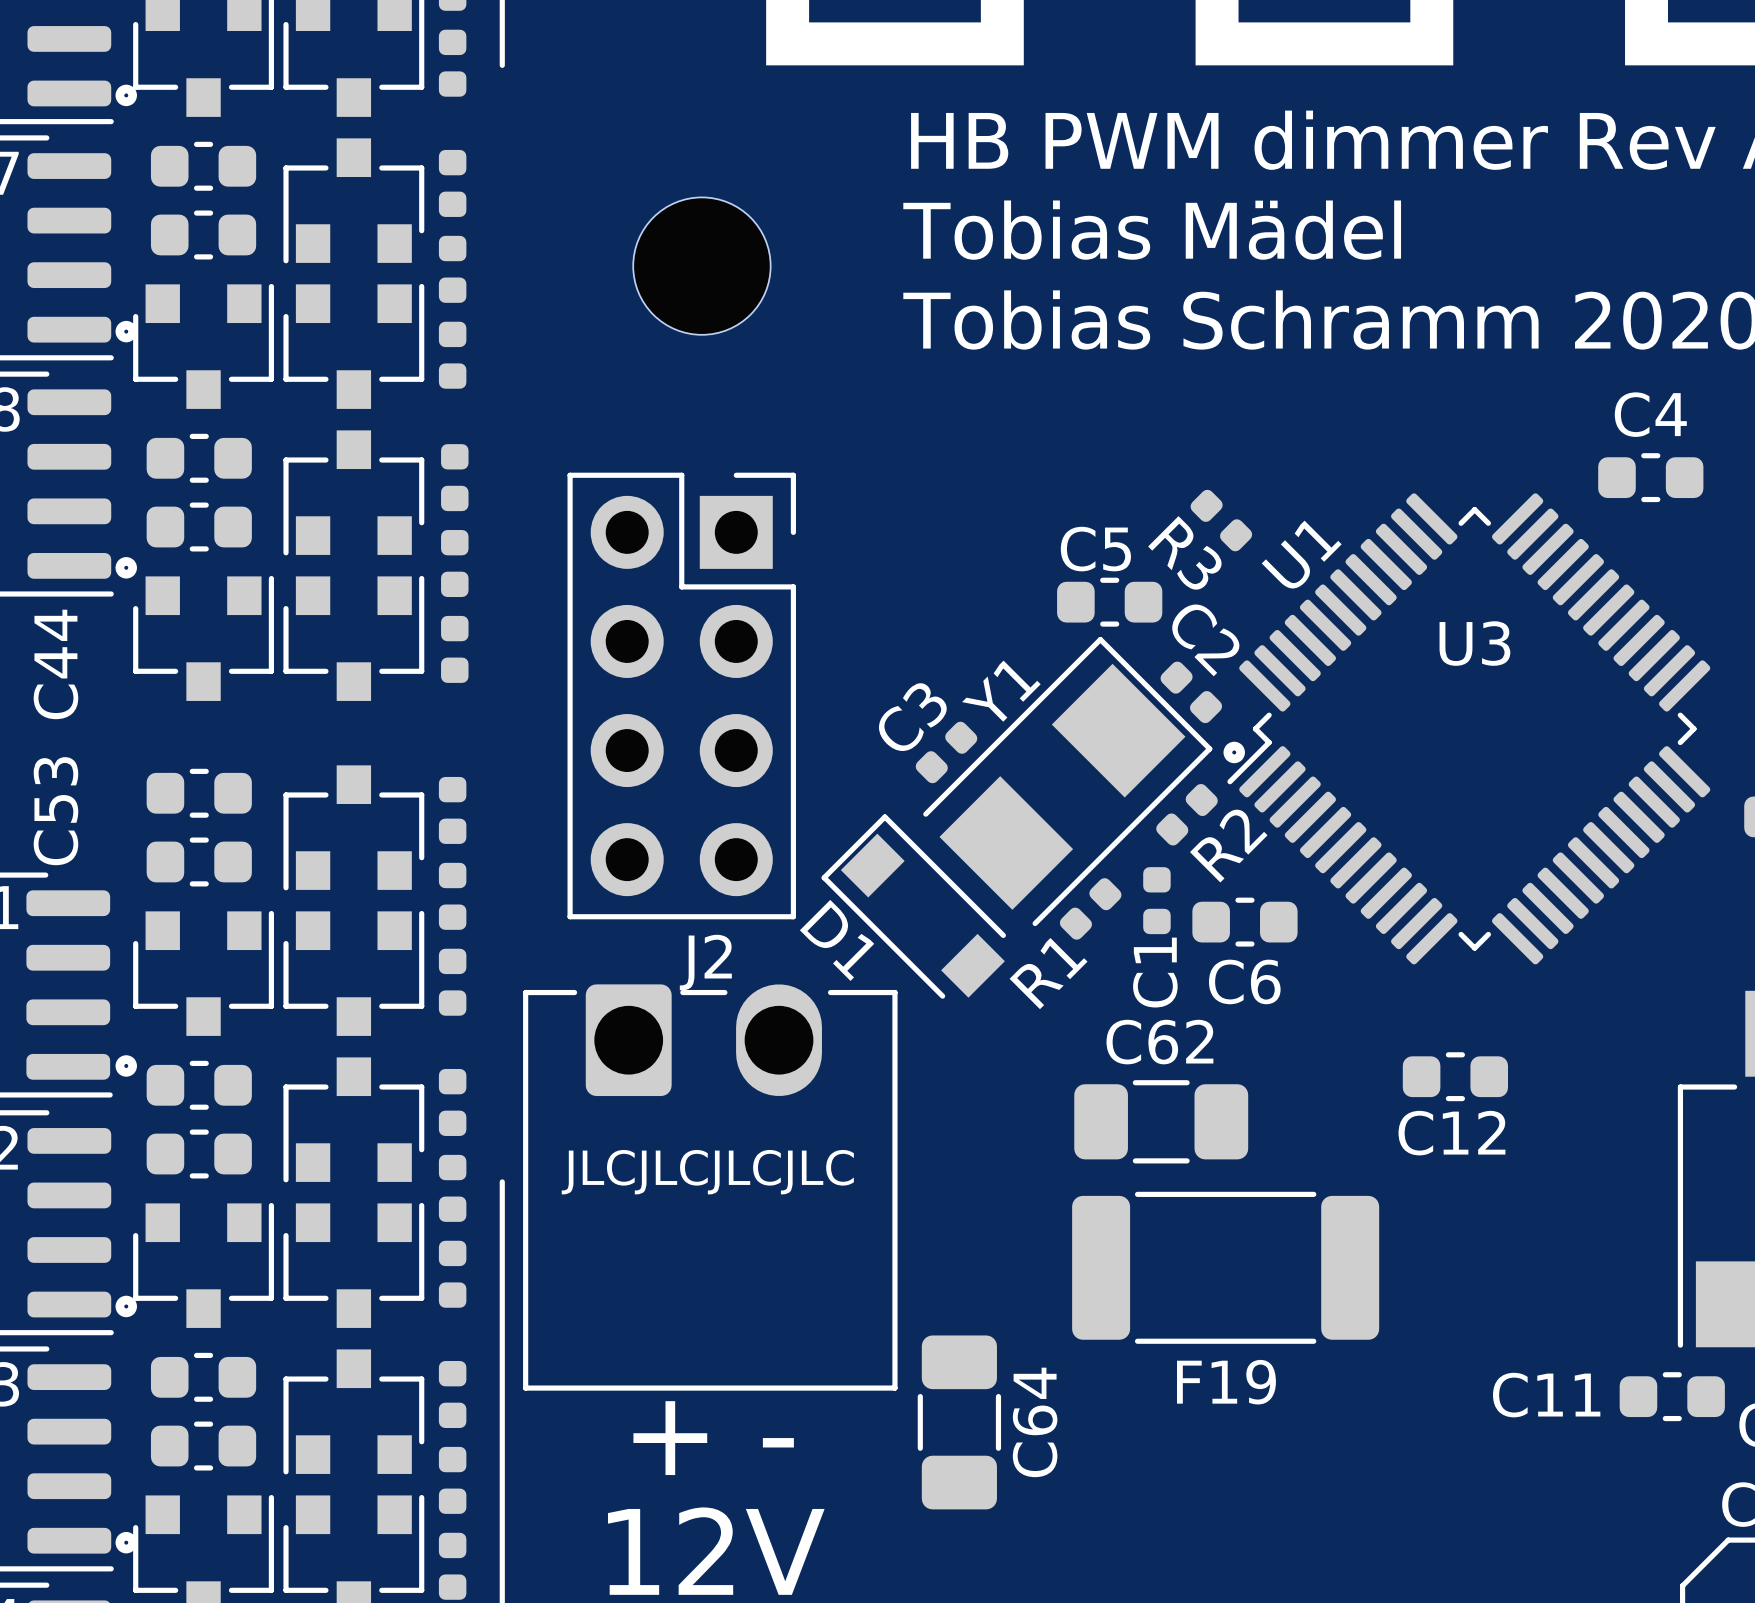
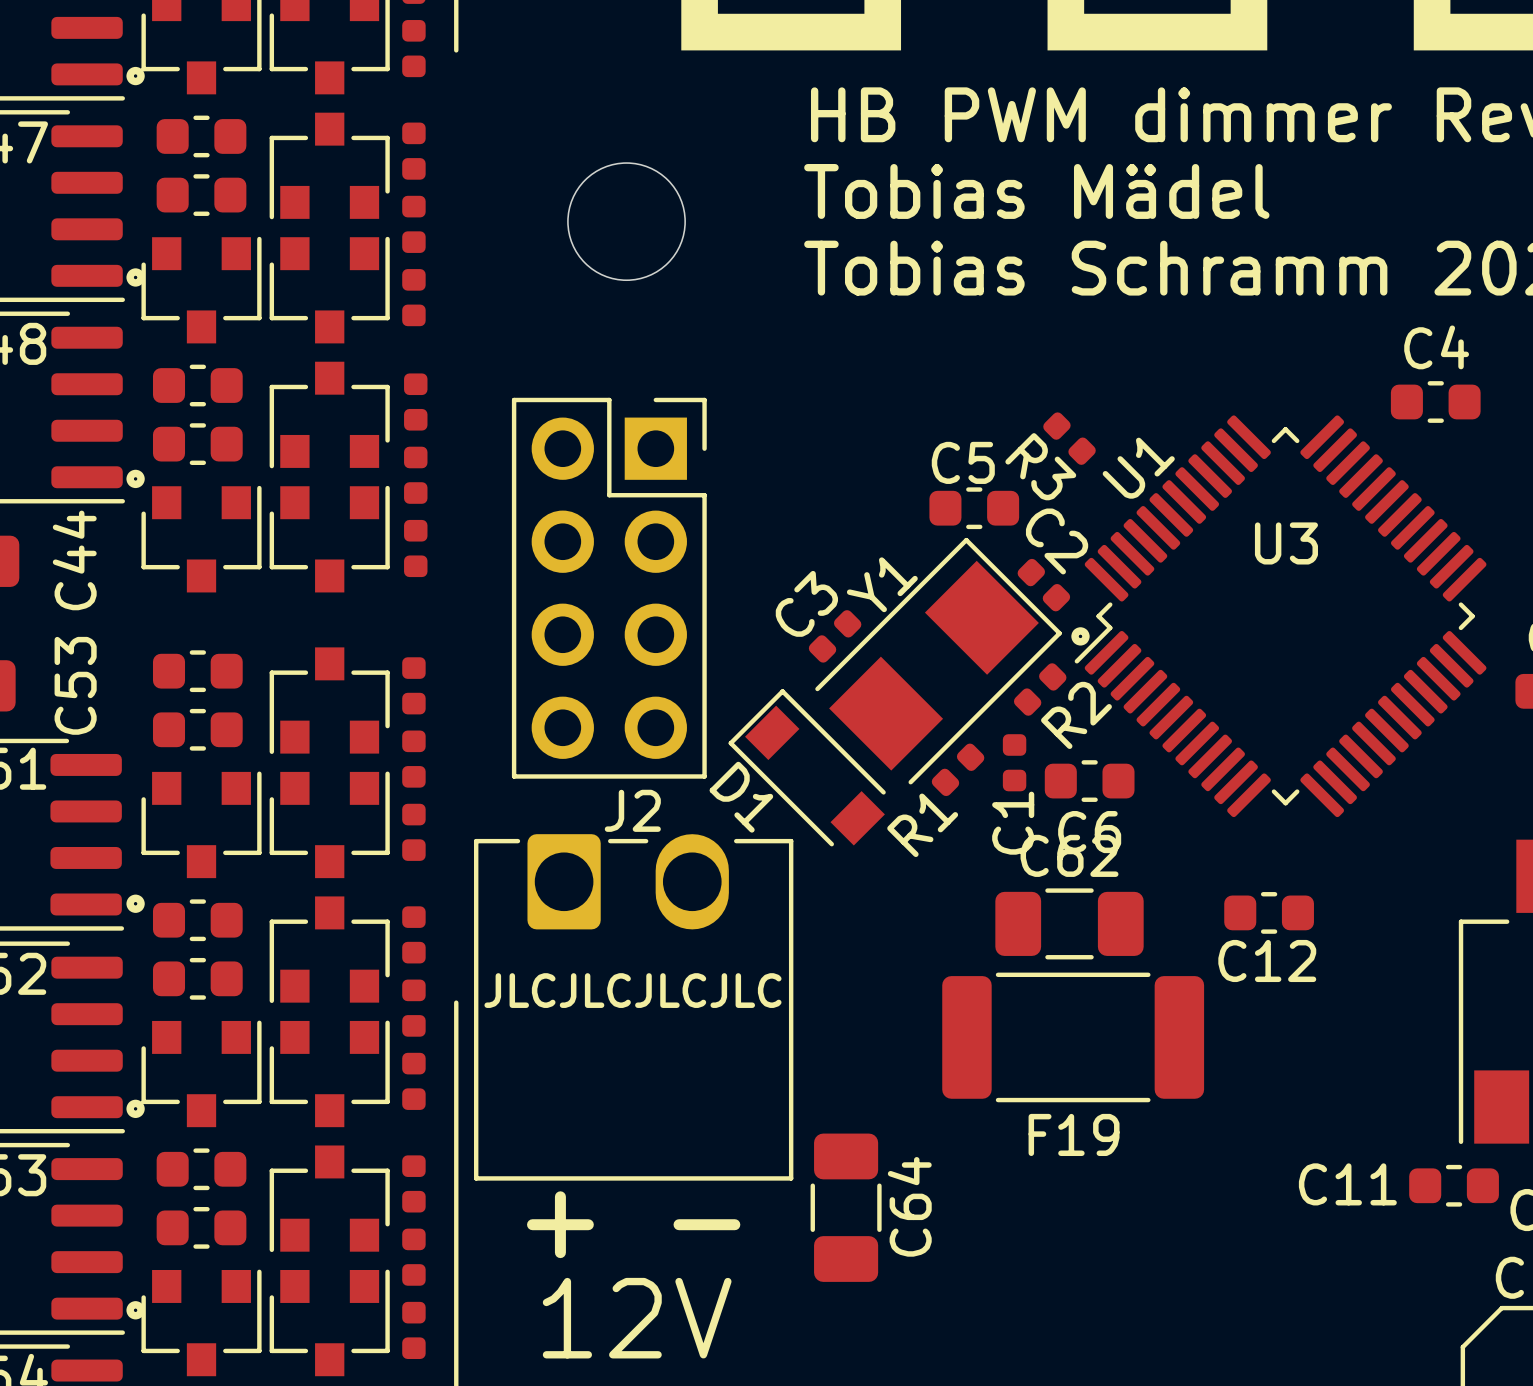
C62 position: (1161, 1121) -> (1069, 923)
F19 position: (1225, 1267) -> (1073, 1037)

